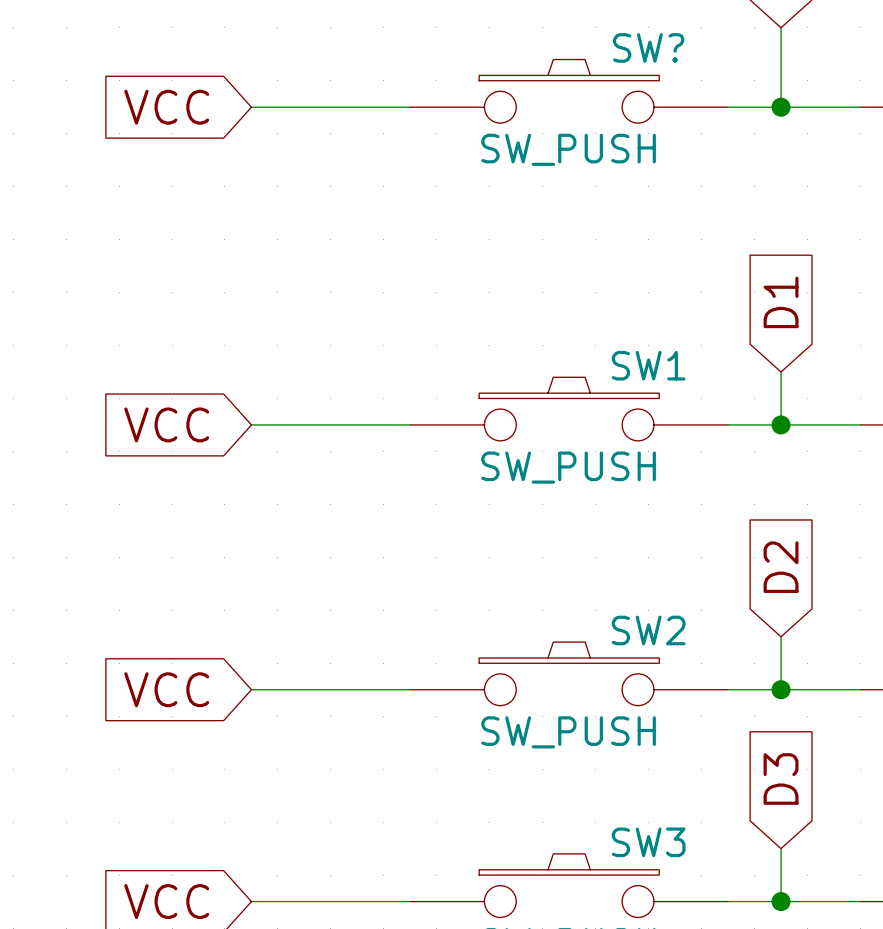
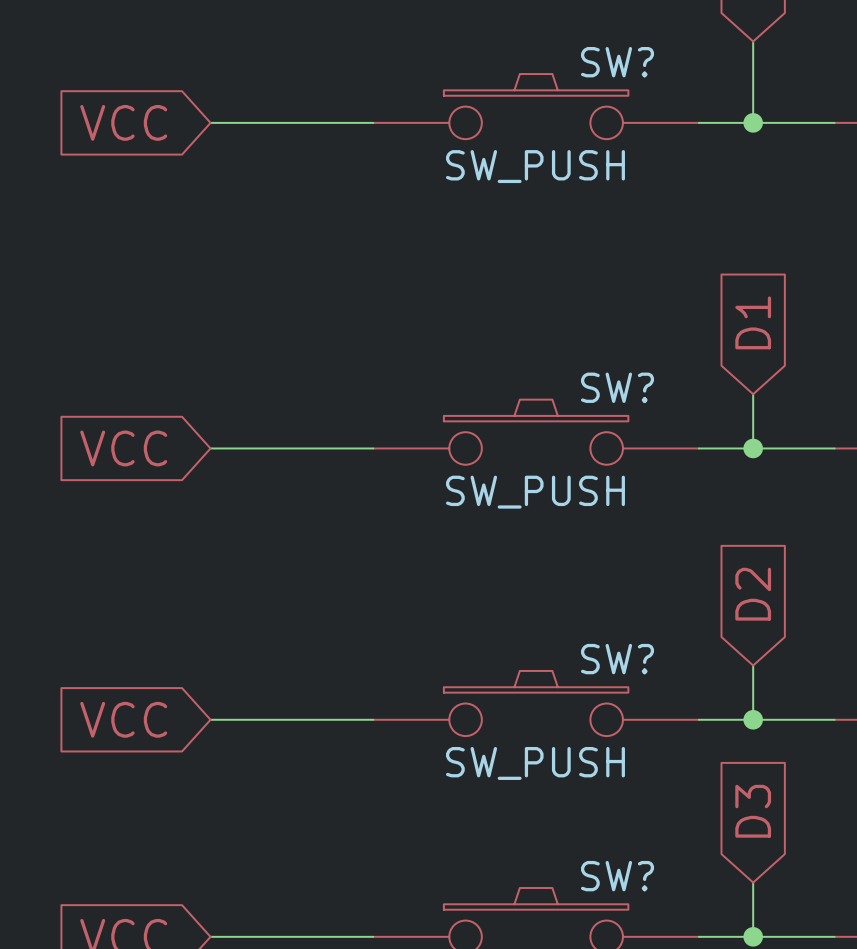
SW1 name: SW1 (648, 365) -> SW? (617, 387)
SW2 name: SW2 (648, 630) -> SW? (617, 659)
SW3 name: SW3 (648, 842) -> SW? (617, 876)

